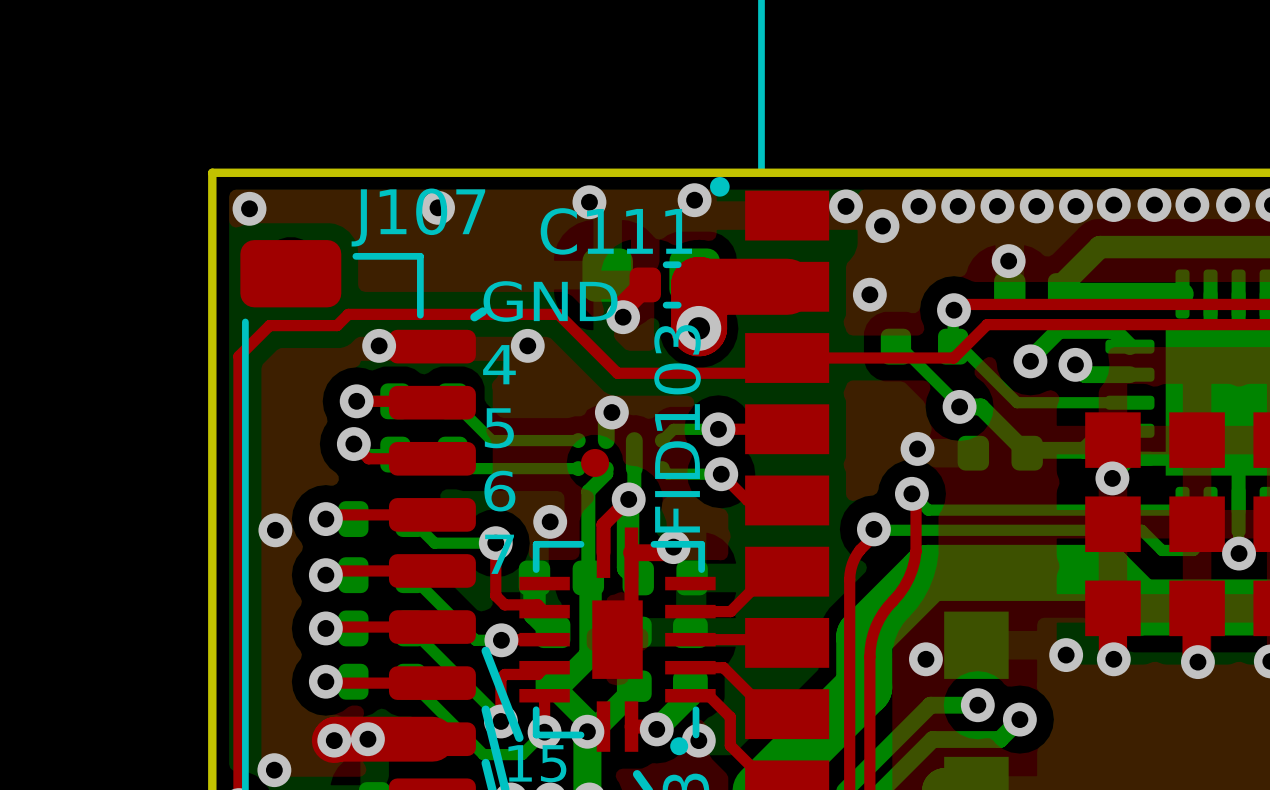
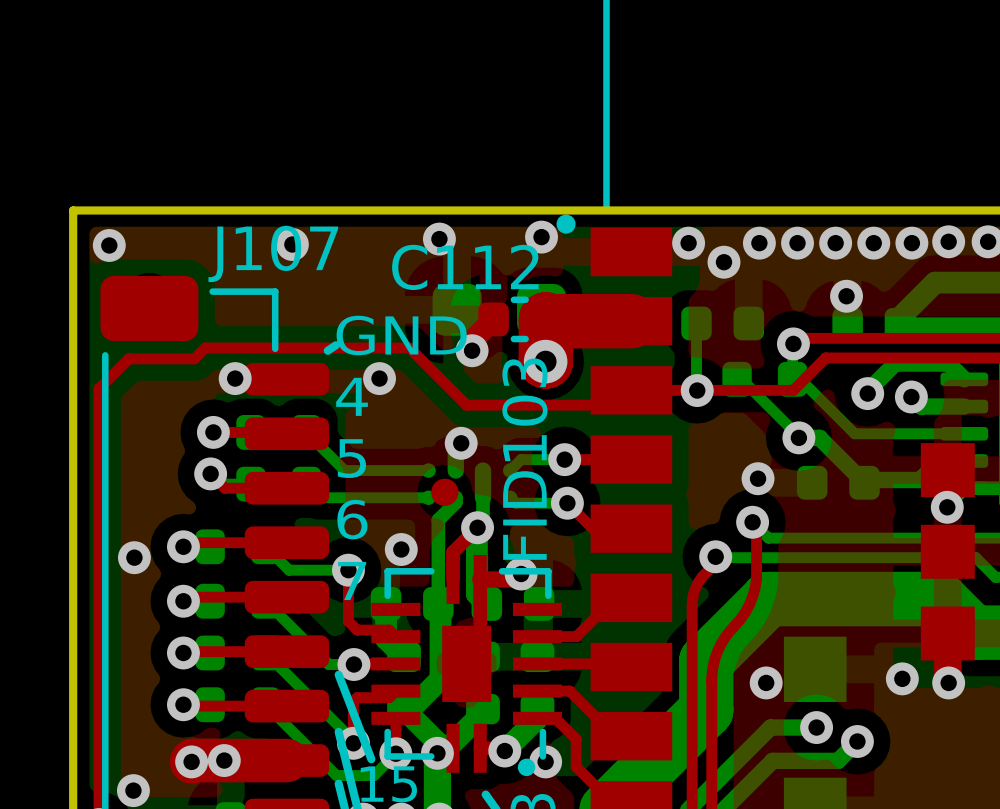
C111 name: C111 (616, 231) -> C112 (465, 267)
bottom track: none -> (696, 323) (696, 389)
part: none -> (722, 323)
via position: (869, 294) -> (697, 390)

